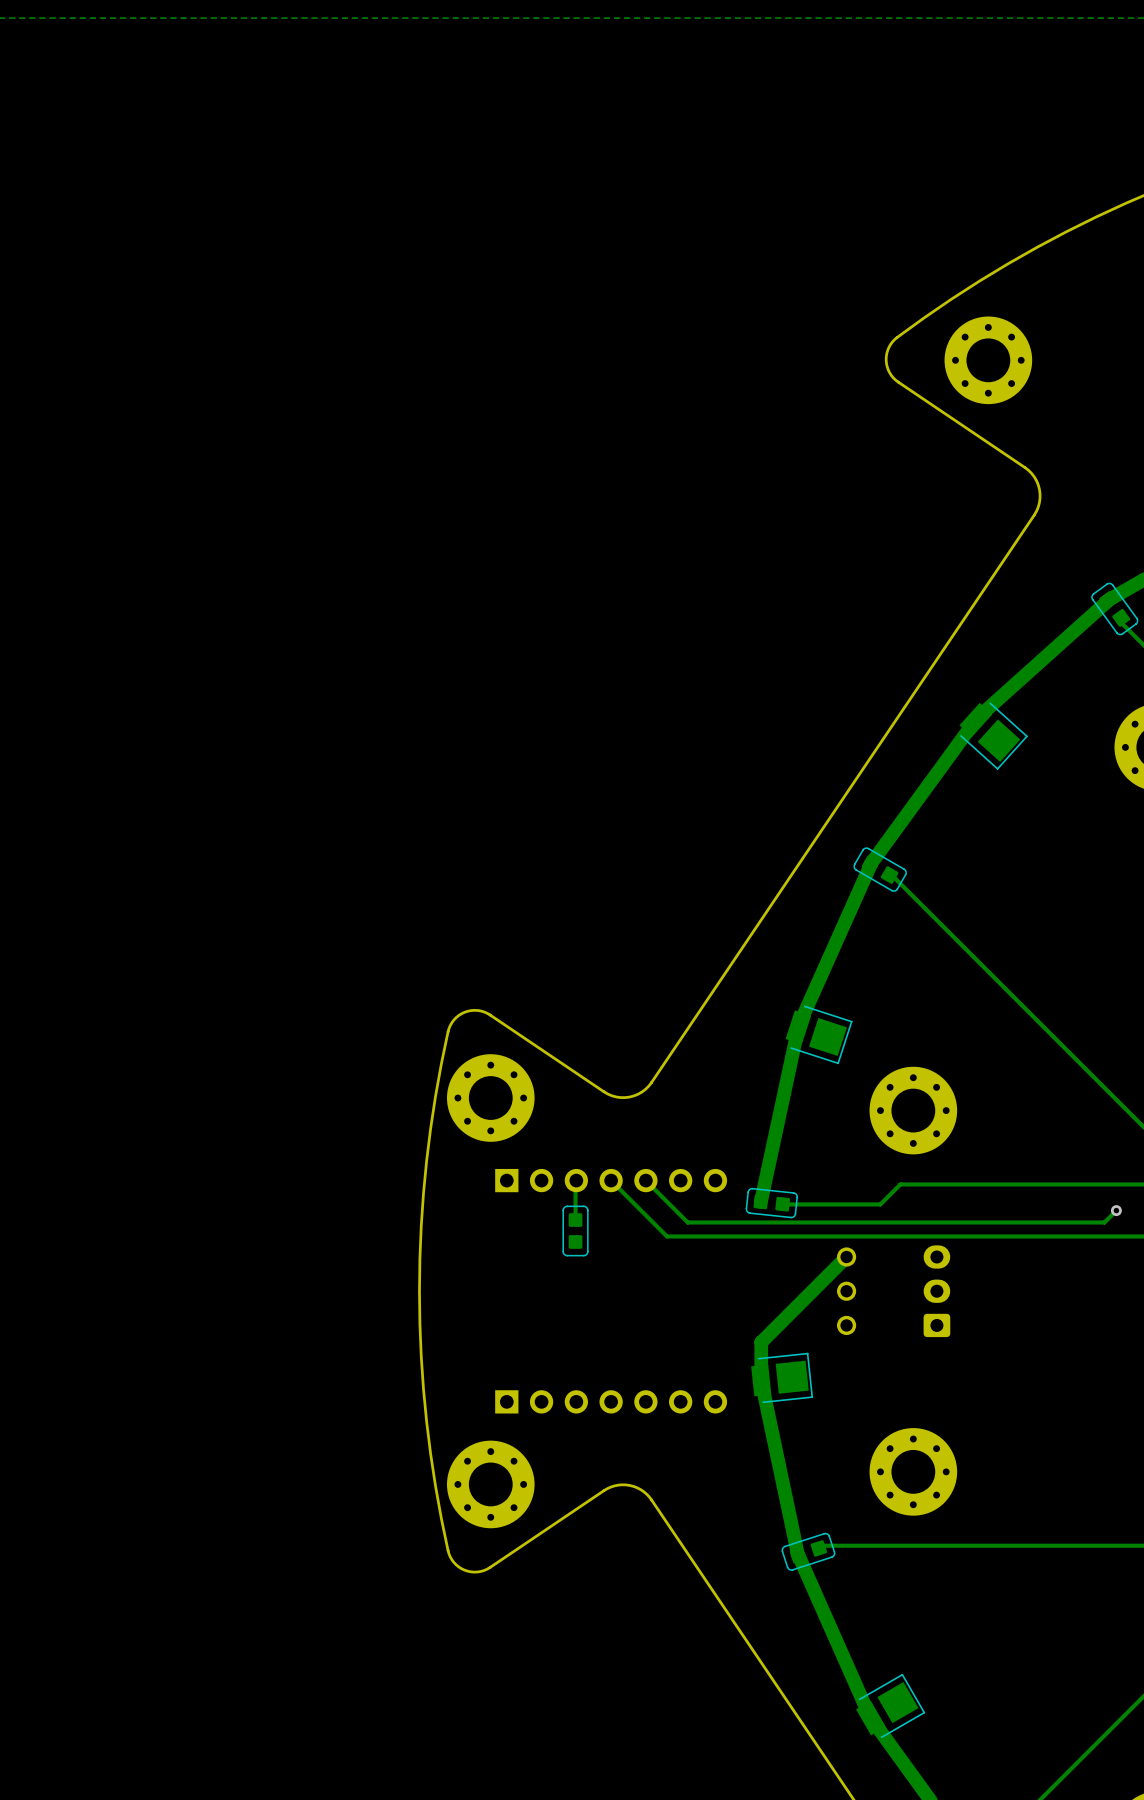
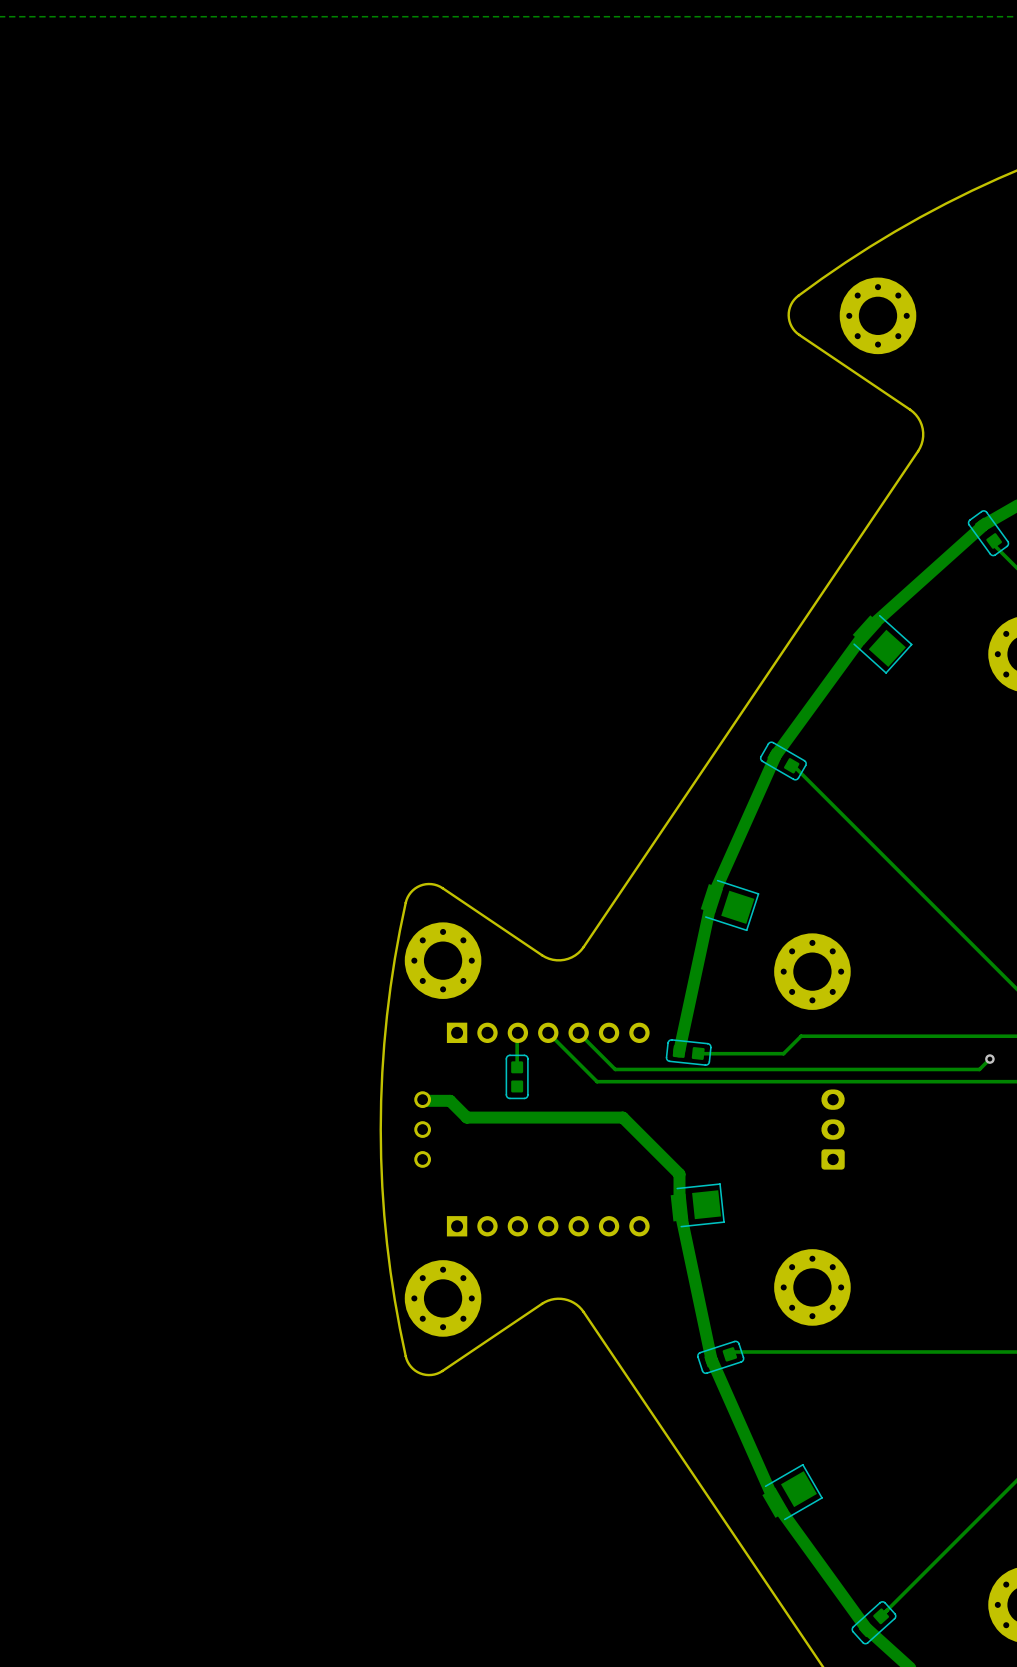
track: (846, 1257) (761, 1342) -> (422, 1100) (450, 1100) (466, 1117) (622, 1117) (679, 1174)
part: none -> (422, 1129)
part: (846, 1291) -> none

